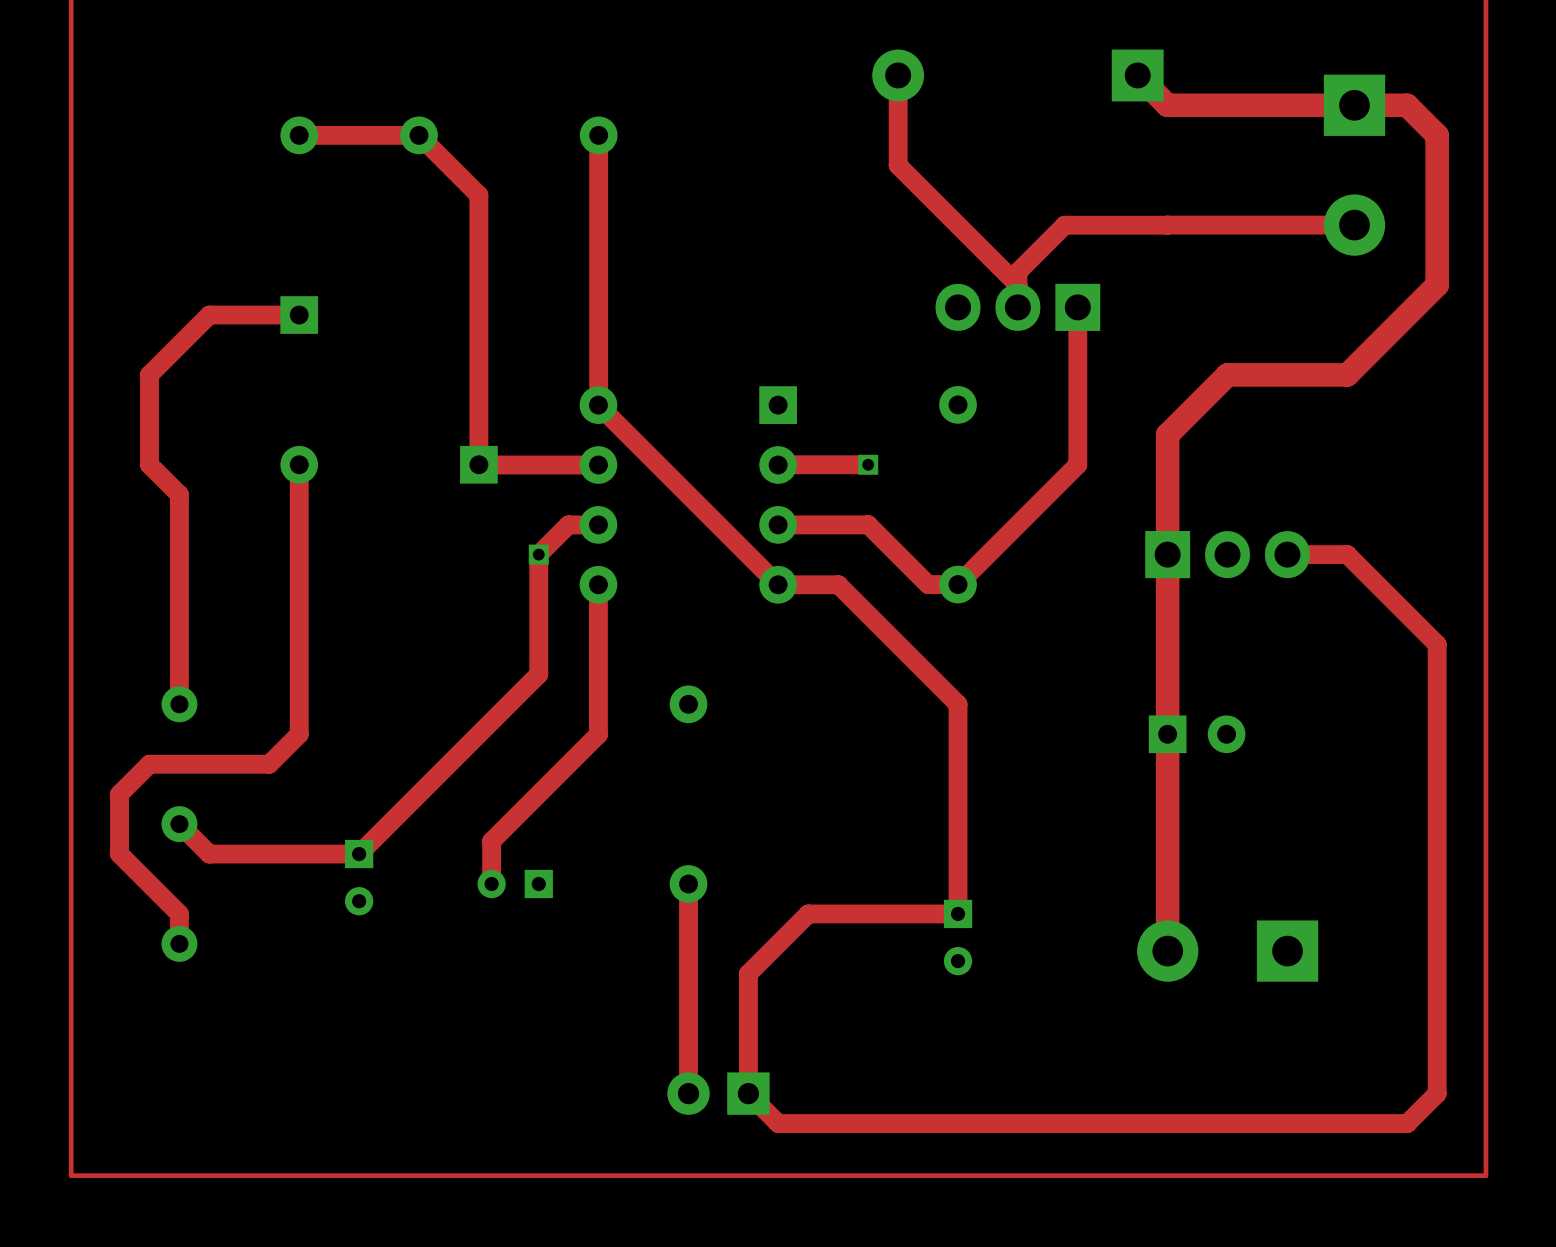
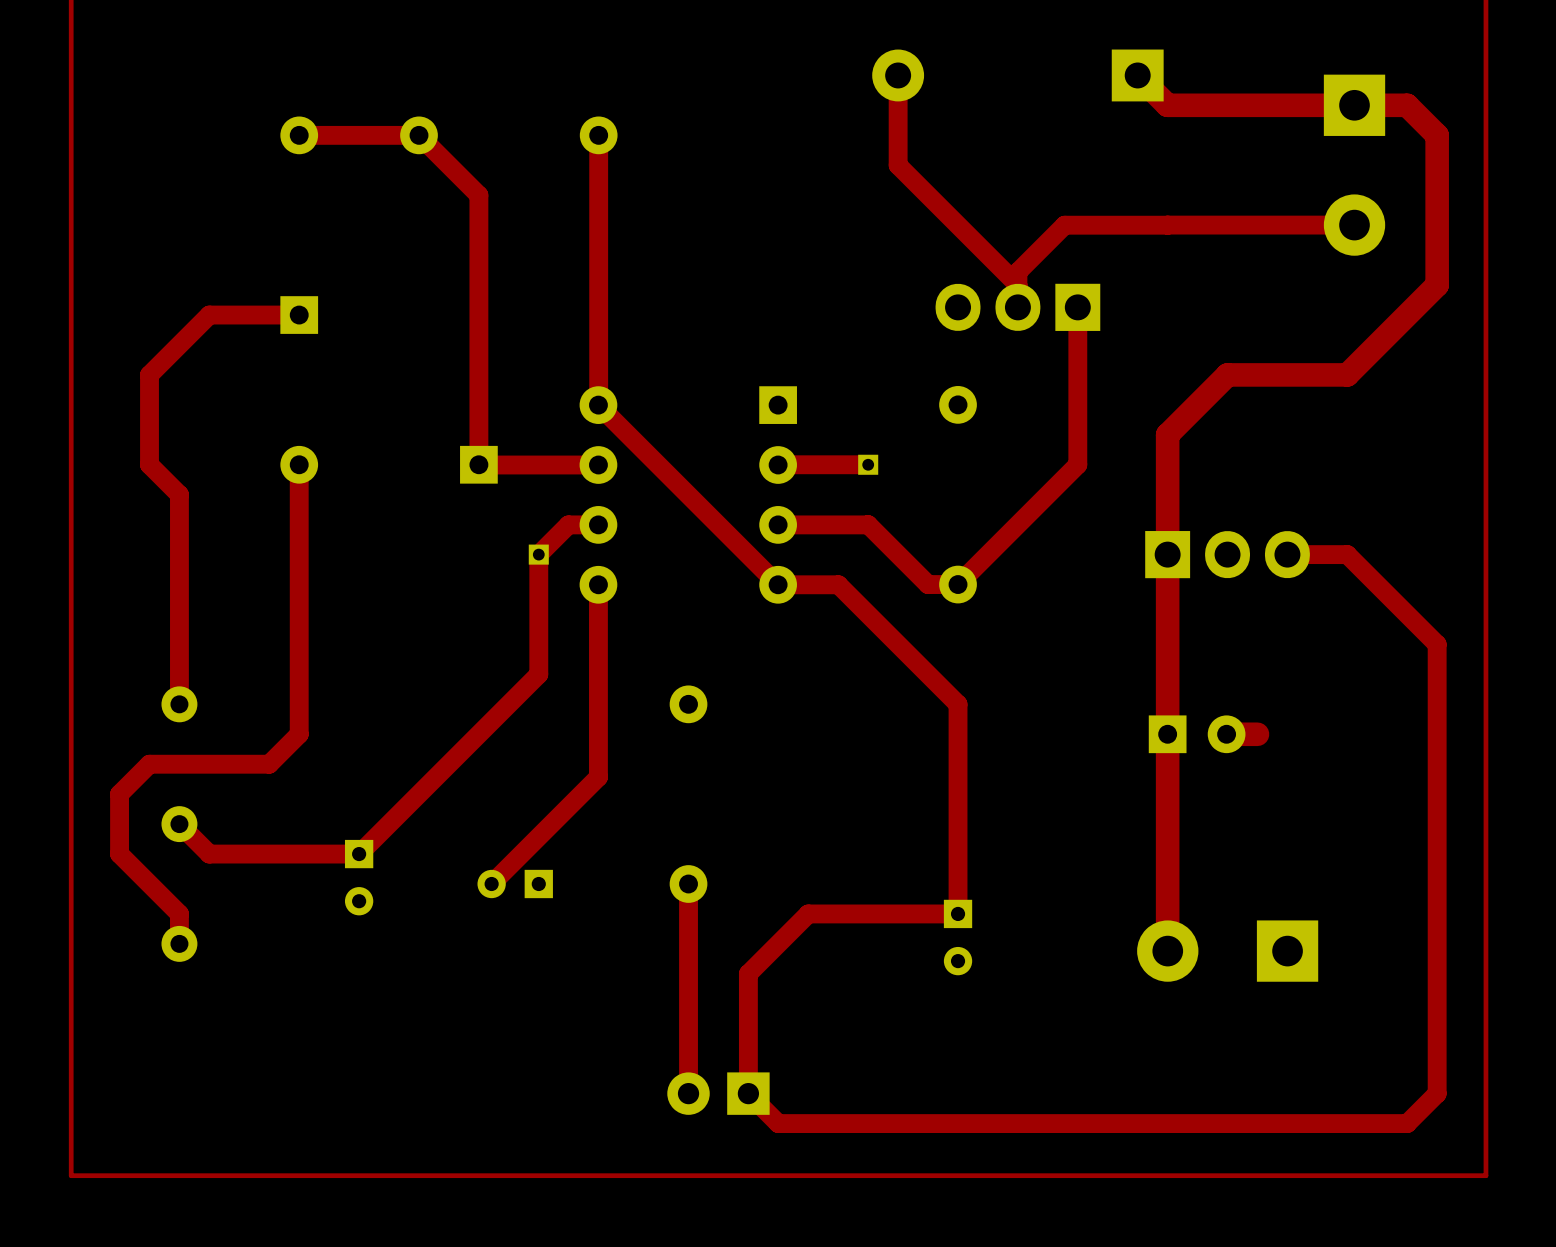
top track: (598, 734) (491, 841) (491, 884) -> (598, 734) (598, 777) (491, 884)
top track: none -> (1257, 734) (1226, 734)

